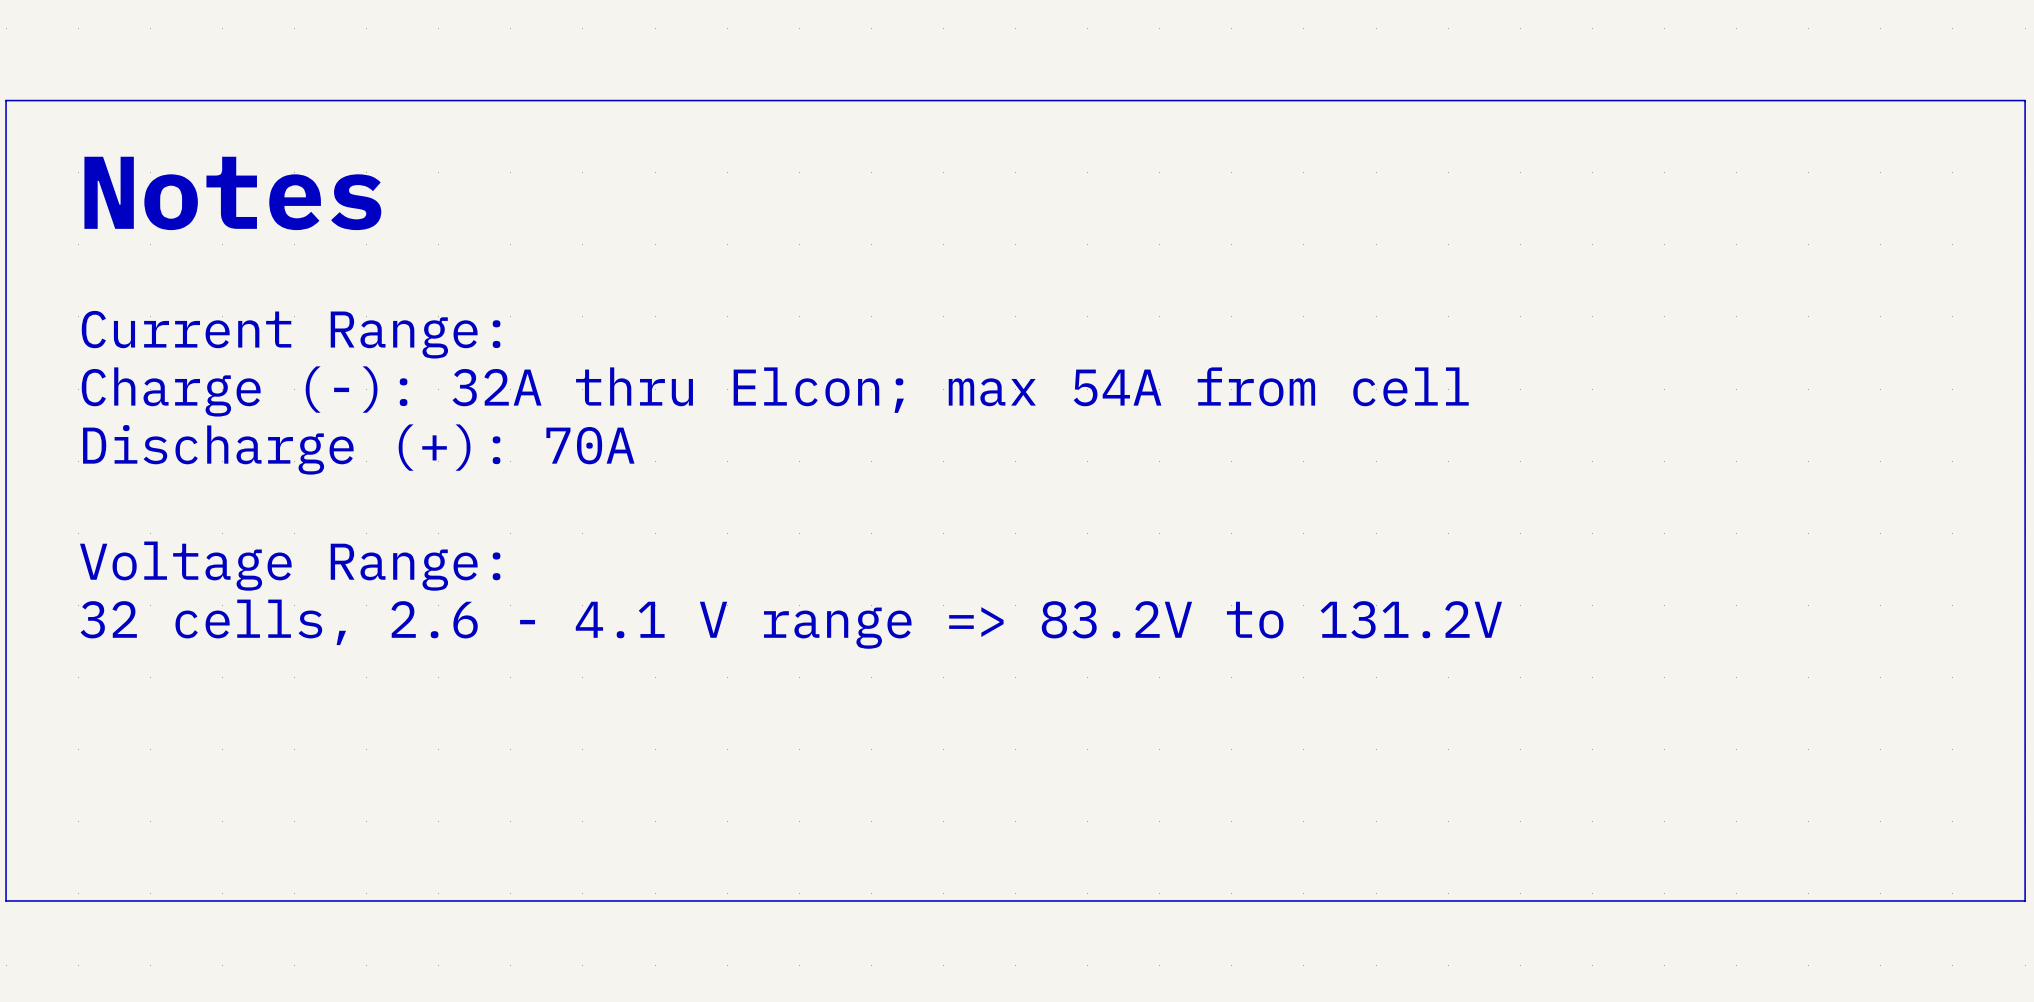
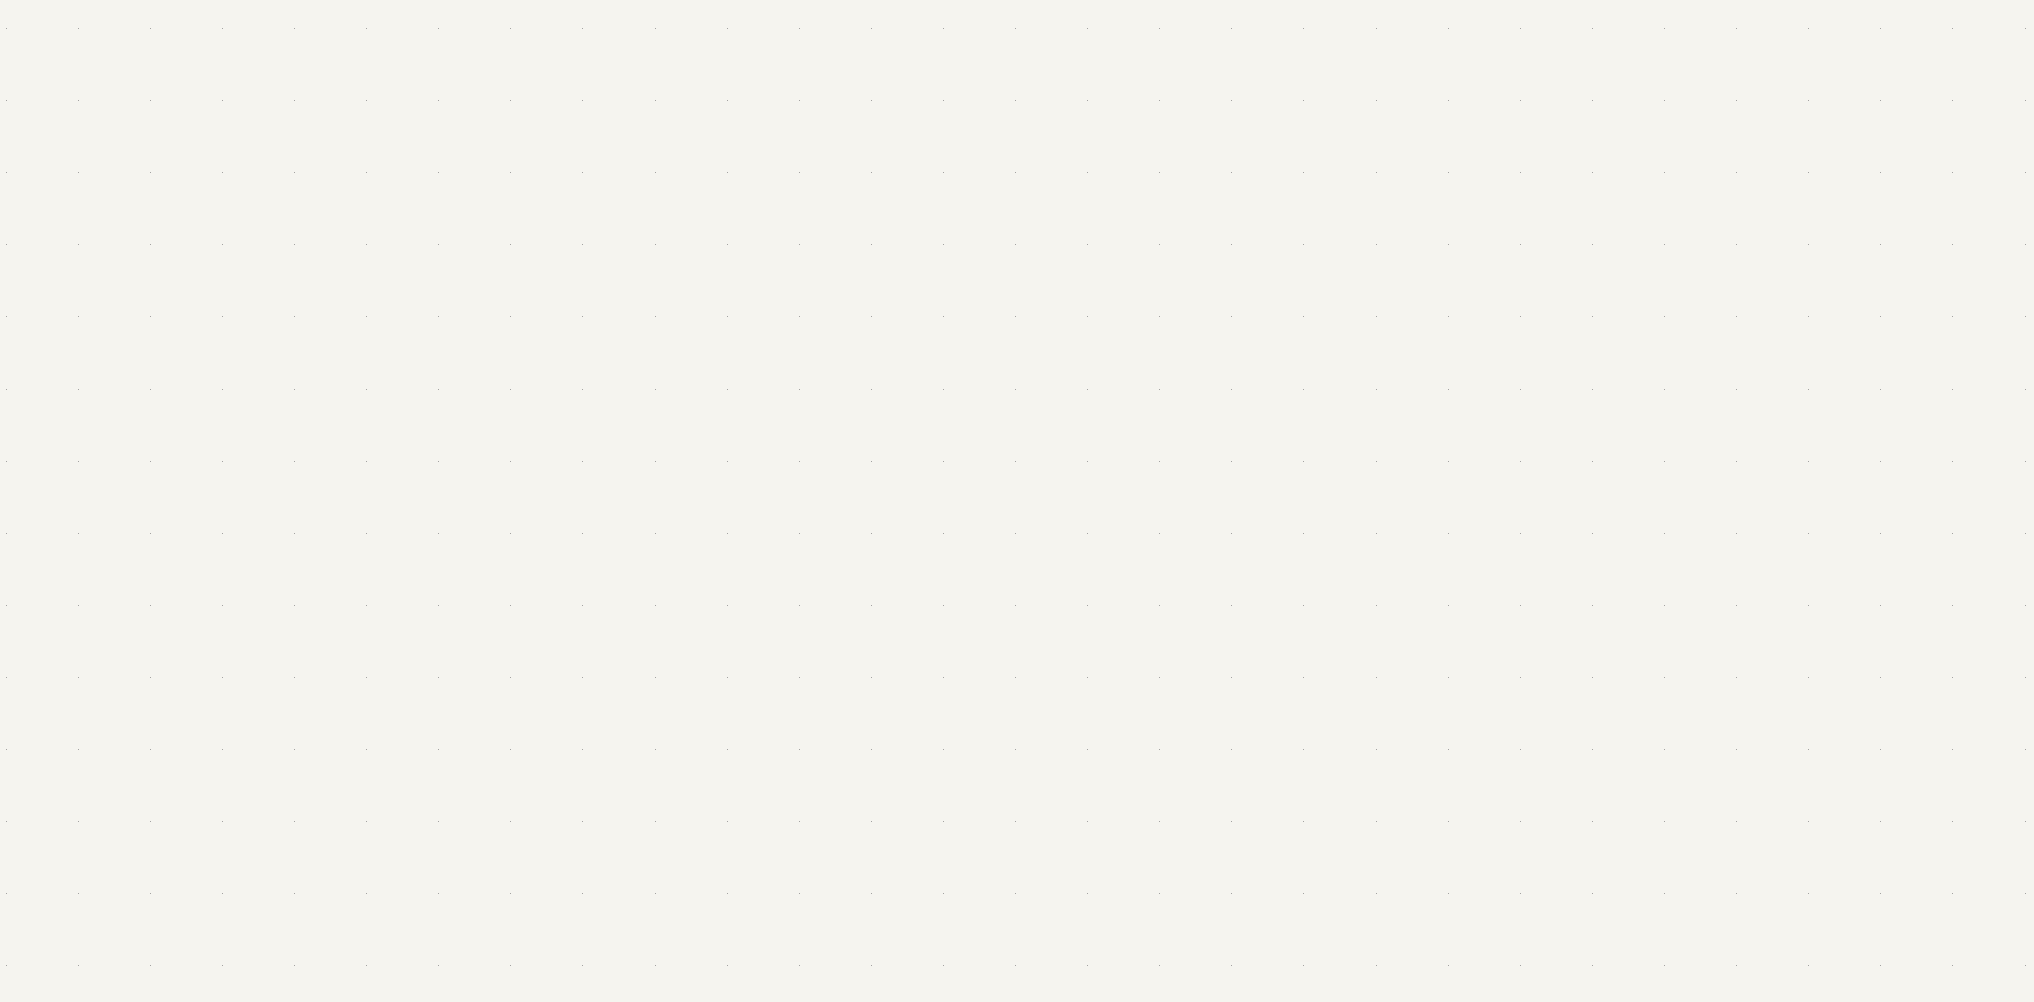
line: (6, 100) (2025, 100) (2025, 900) (6, 900) (6, 100) -> none
text: Notes (232, 193) -> none
text: Current Range: (291, 334) -> none
text: Charge (-): 32A thru Elcon; max 54A from cell (775, 391) -> none
text: Discharge (+): 70A (358, 449) -> none
text: Voltage Range: (290, 566) -> none
text: 32 cells, 2.6 - 4.1 V range => 83.2V to 131.2V (791, 624) -> none

